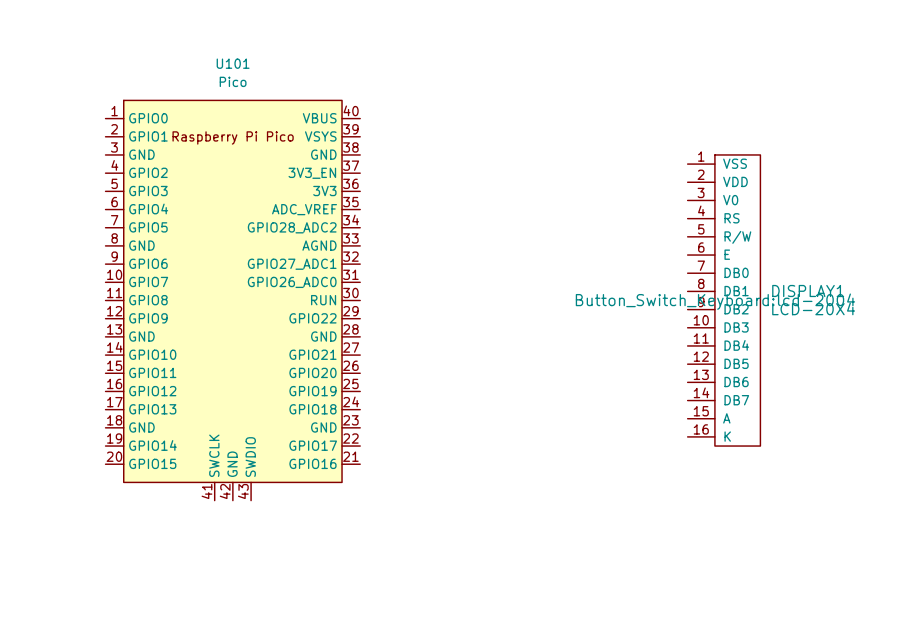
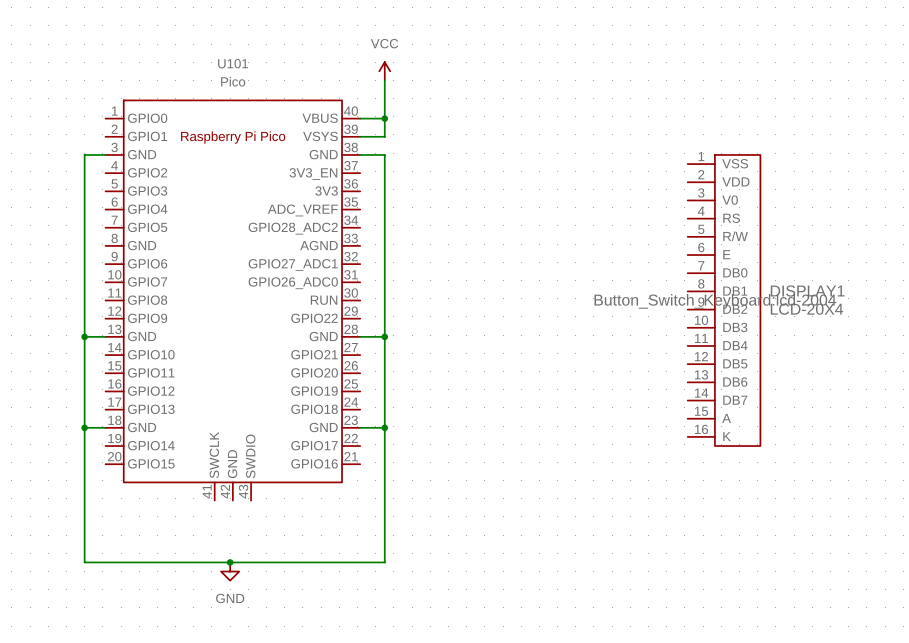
power symbol: none -> VCC (384, 71)
wire: none -> (384, 80) (384, 136) (360, 136)
wire: none -> (360, 118) (384, 118)
junction: none -> (384, 118)
wire: none -> (105, 154) (84, 154) (84, 562) (384, 562) (384, 154) (360, 154)
wire: none -> (84, 336) (105, 336)
junction: none -> (84, 336)
wire: none -> (360, 336) (384, 336)
junction: none -> (384, 336)
wire: none -> (84, 427) (105, 427)
junction: none -> (84, 427)
wire: none -> (360, 427) (384, 427)
junction: none -> (384, 427)
junction: none -> (230, 562)
power symbol: none -> GND (230, 571)

